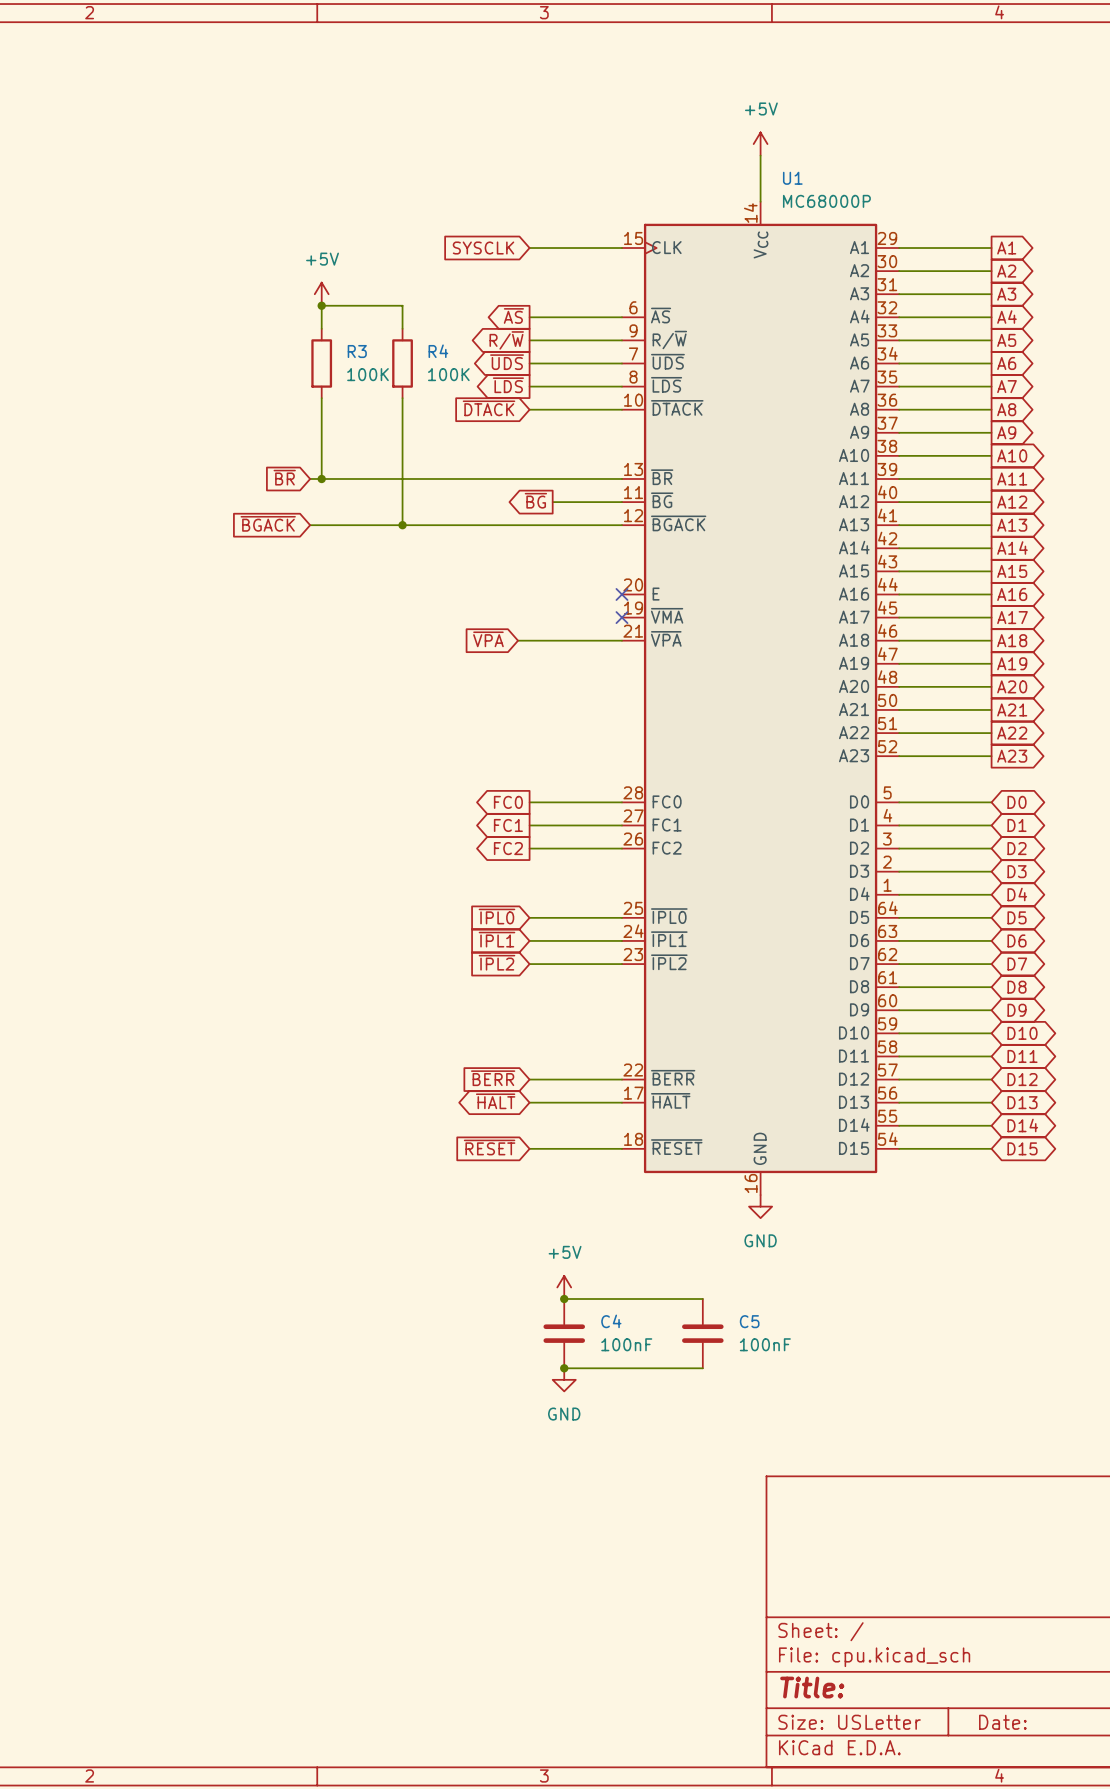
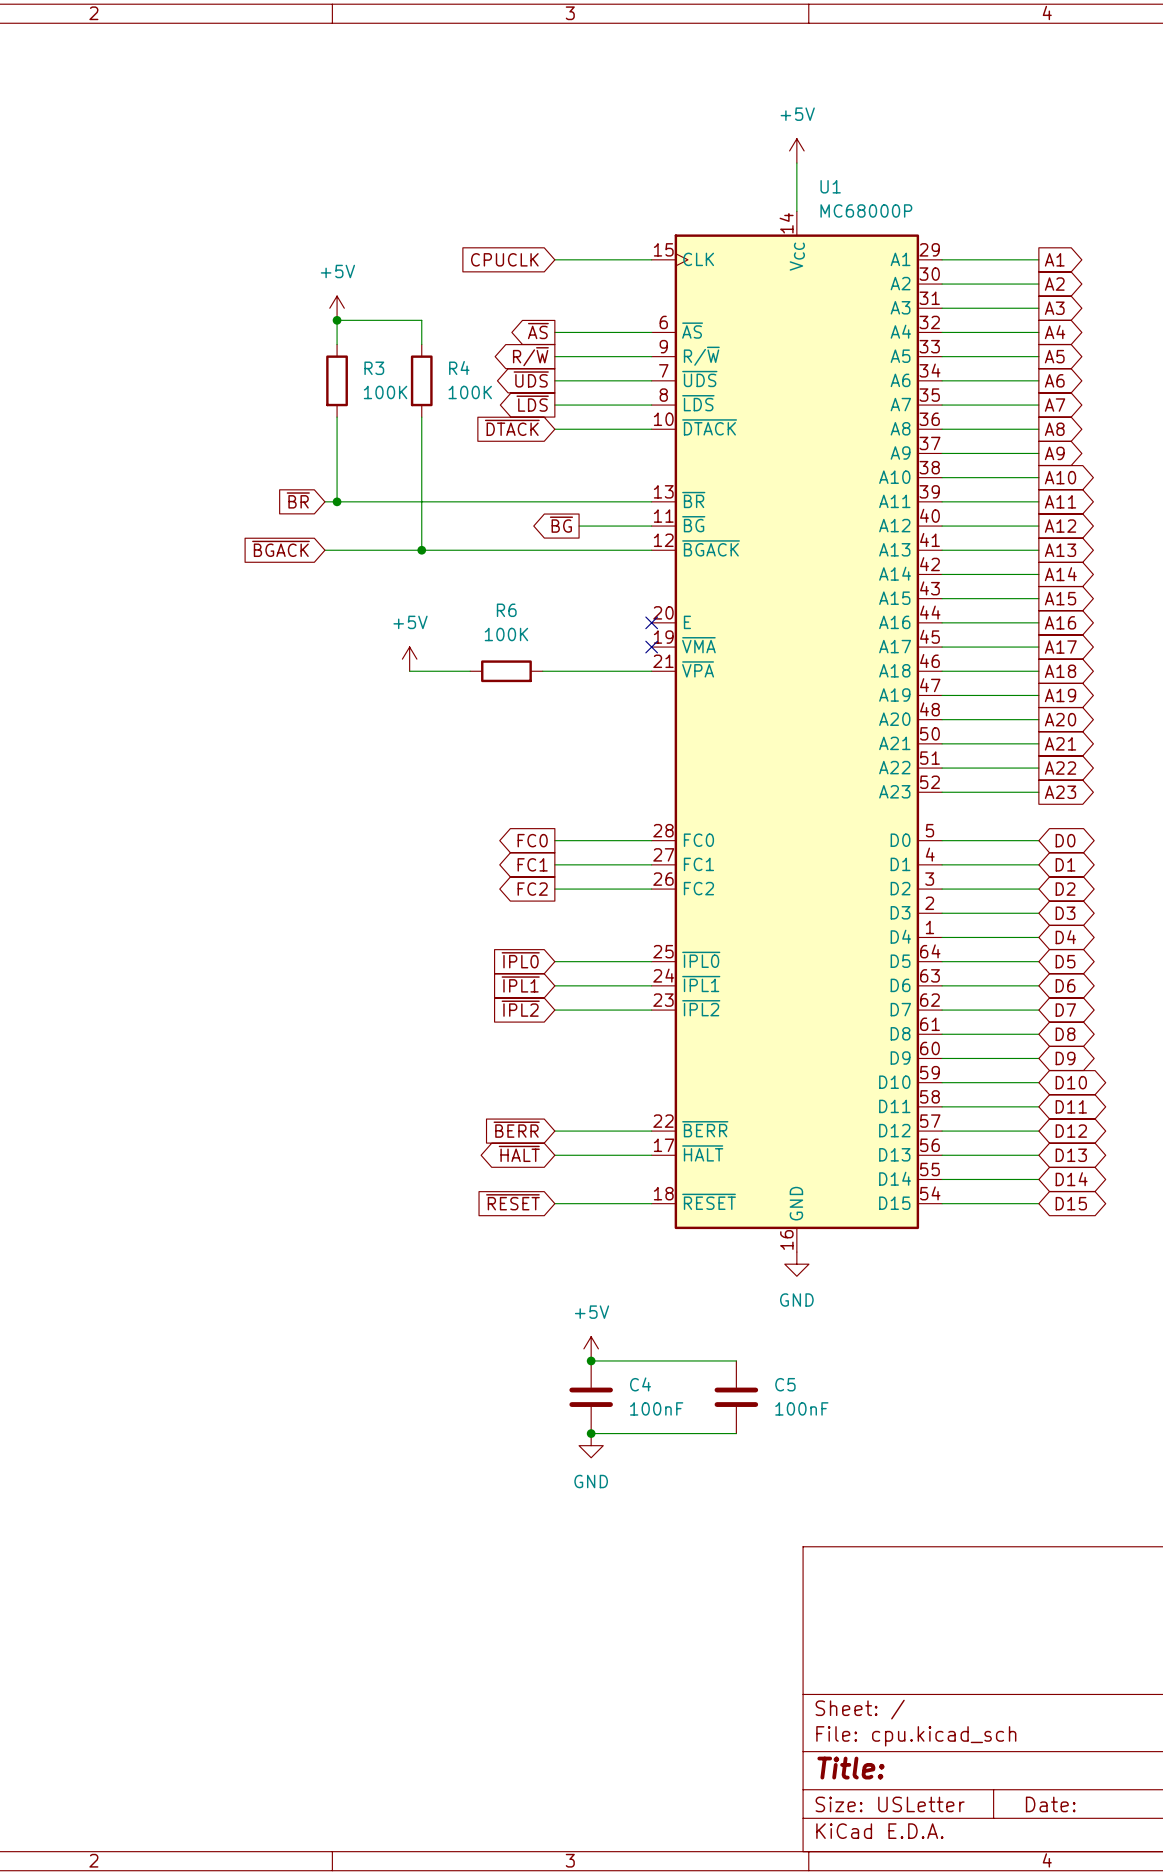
global label: SYSCLK (483, 248) -> CPUCLK (504, 259)
power symbol: none -> +5V (409, 659)
global label: ~{VPA} (488, 639) -> none
wire: none -> (409, 671) (470, 671)
R6: none -> 100K (506, 671)

